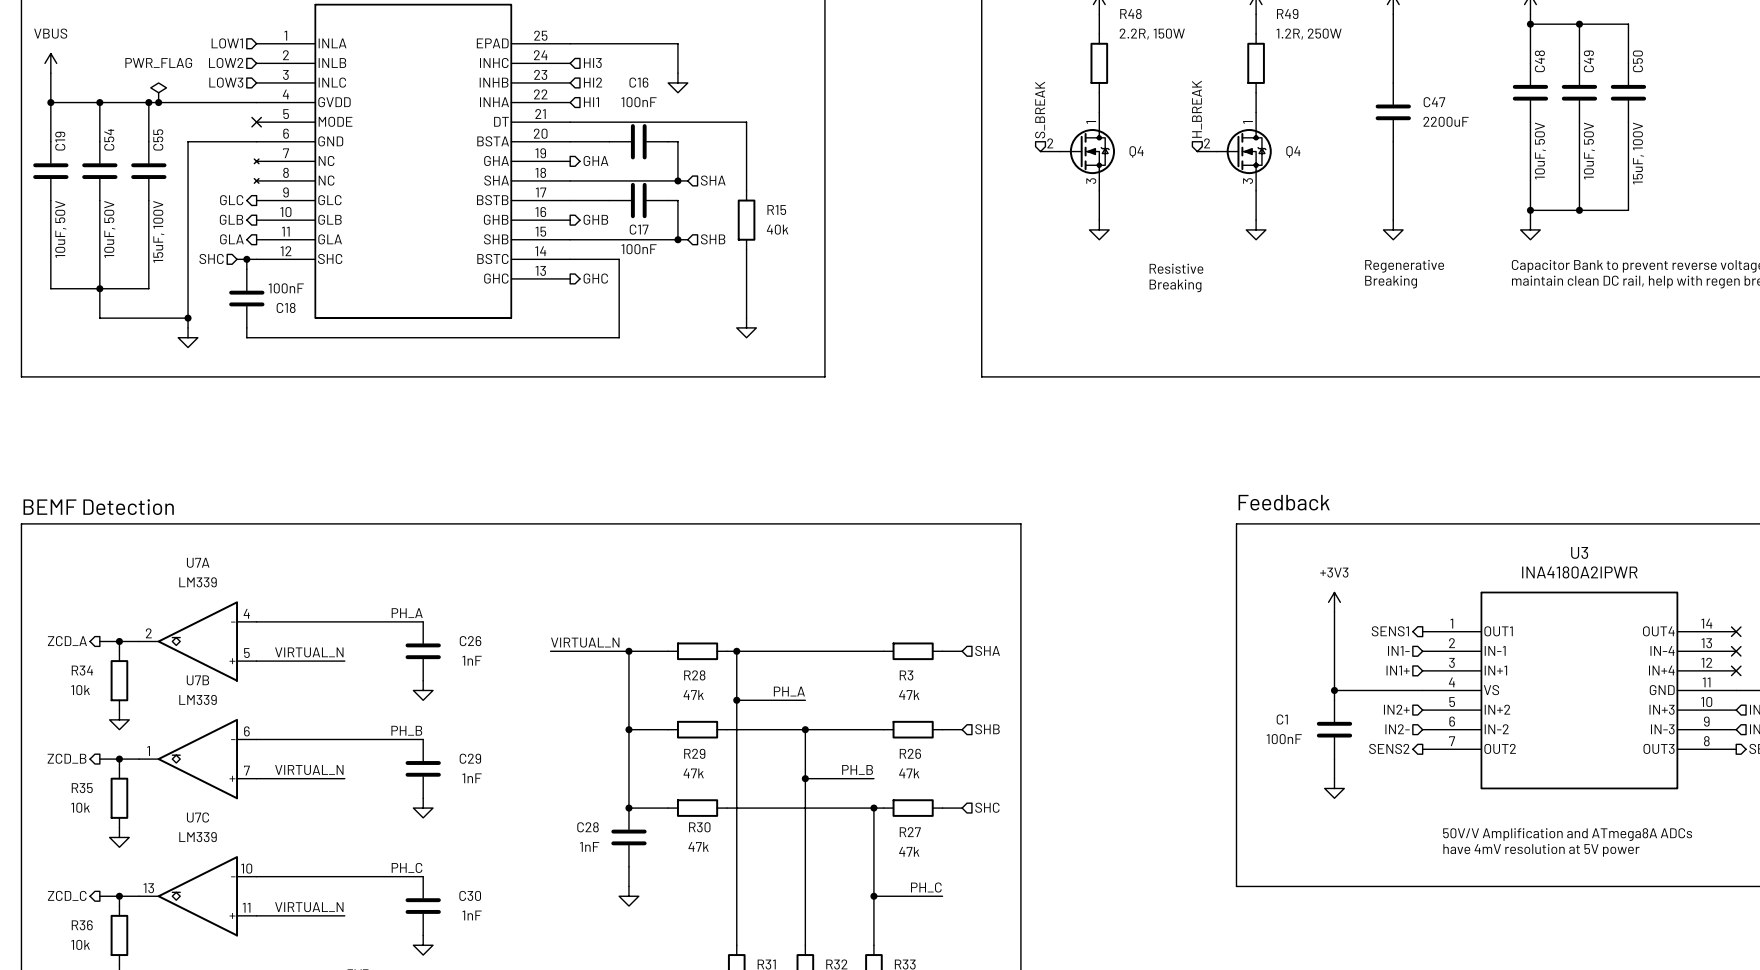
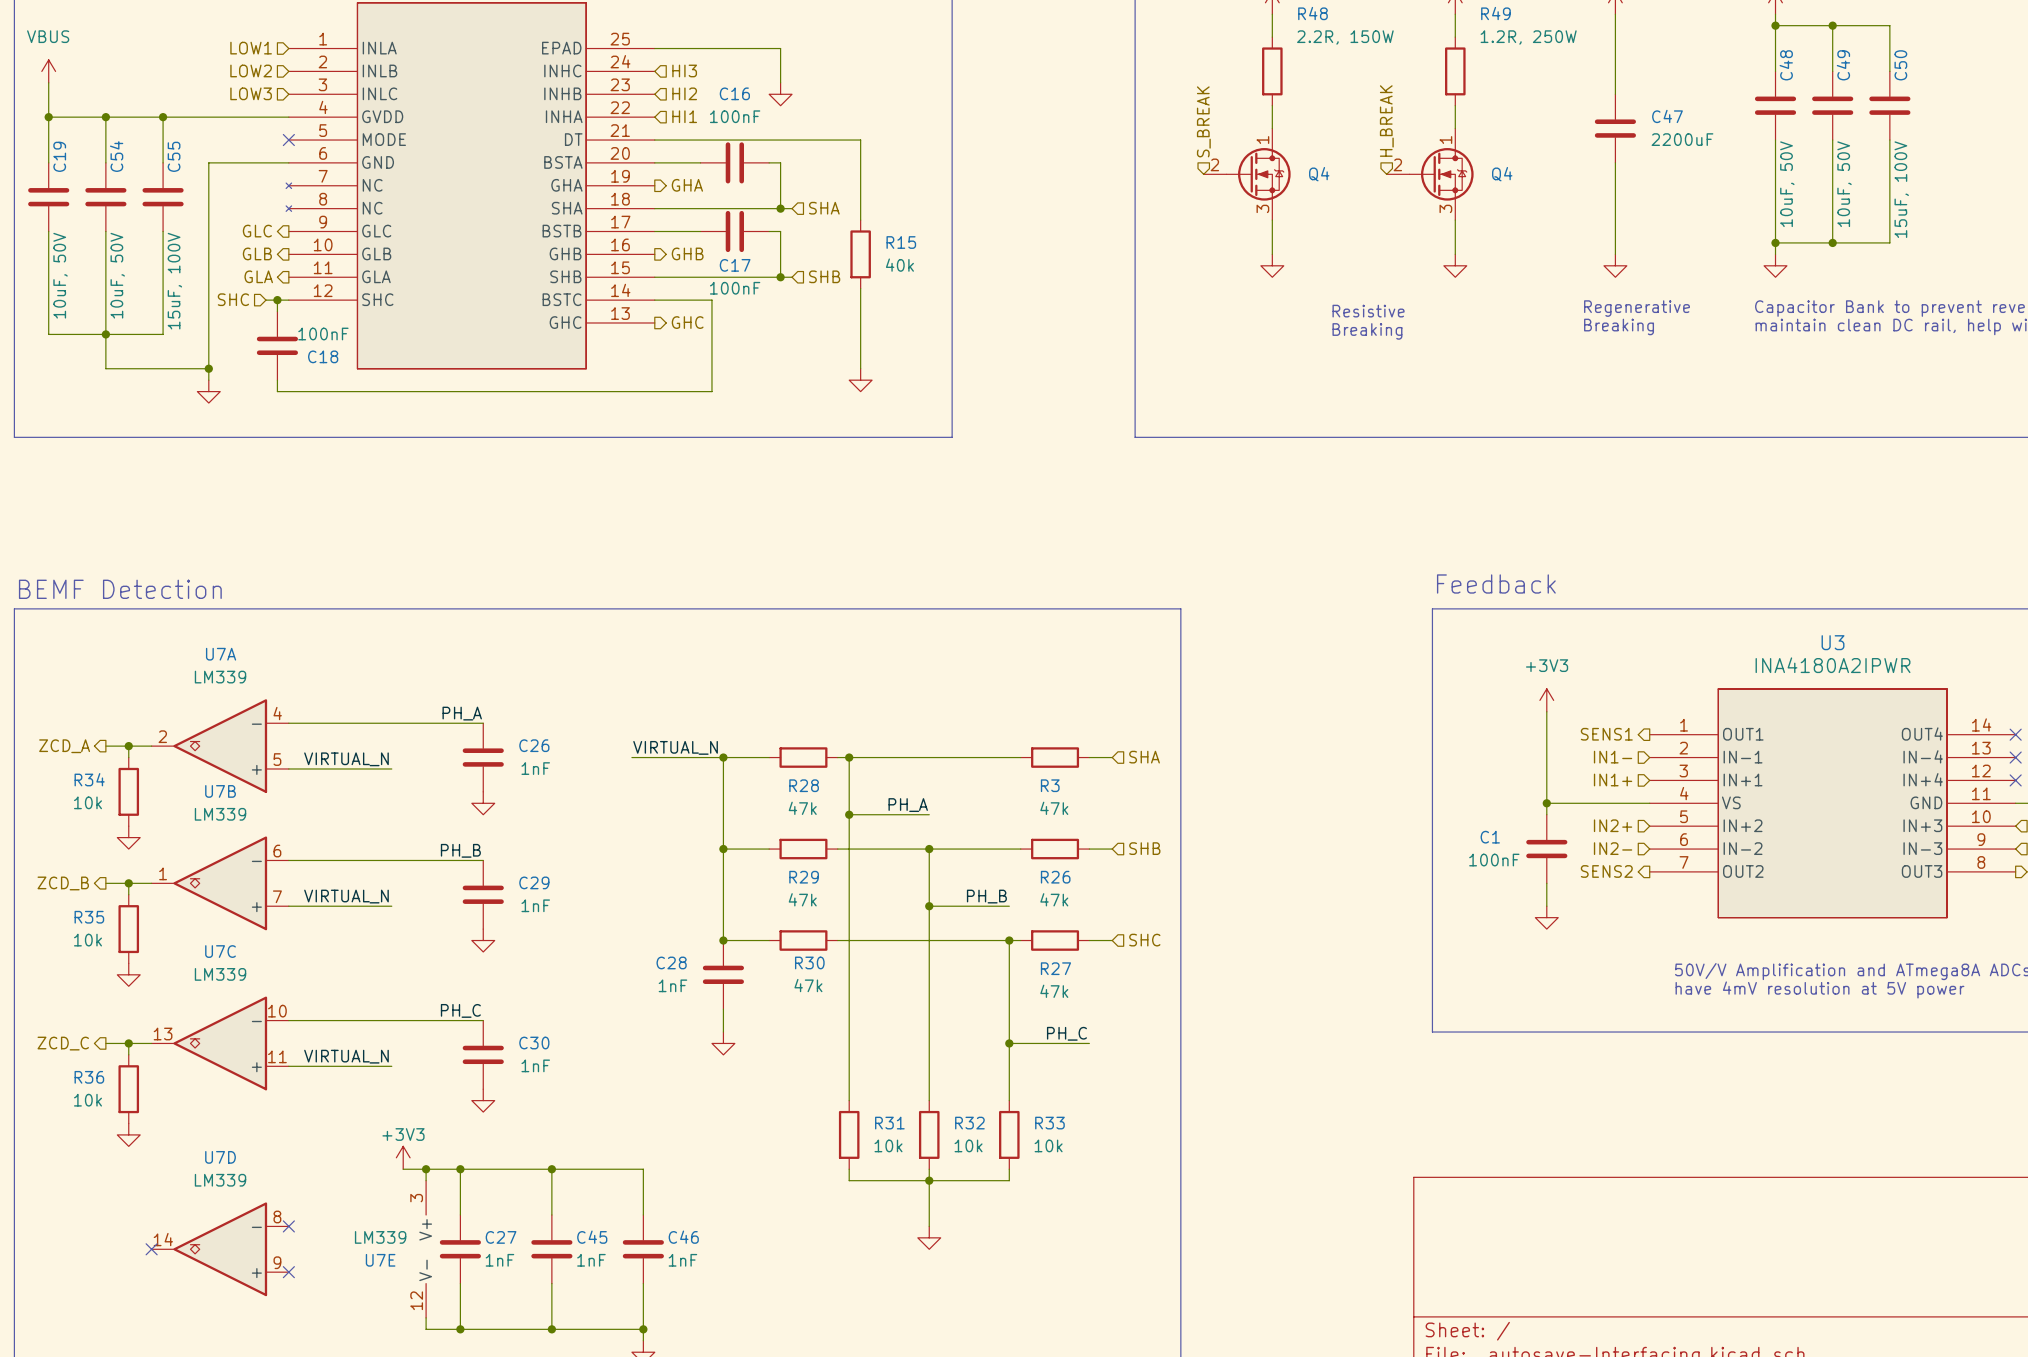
power symbol: PWR_FLAG (158, 92) -> none
junction: (158, 102) -> none

